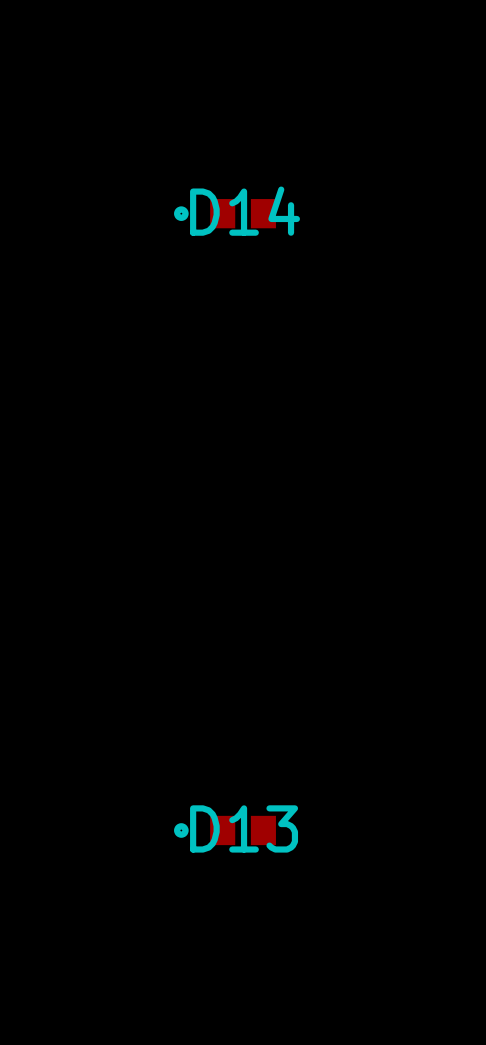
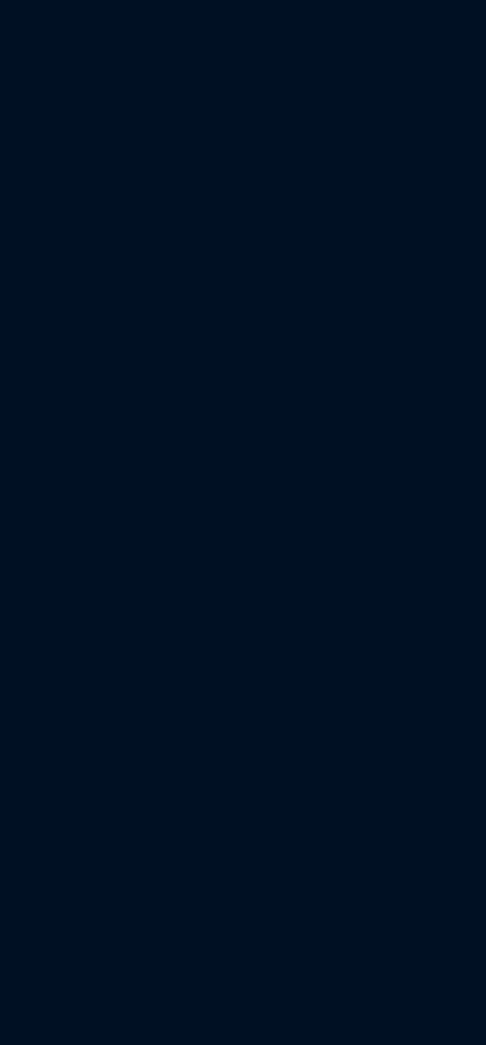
D14: (224, 213) -> none
D13: (224, 830) -> none

